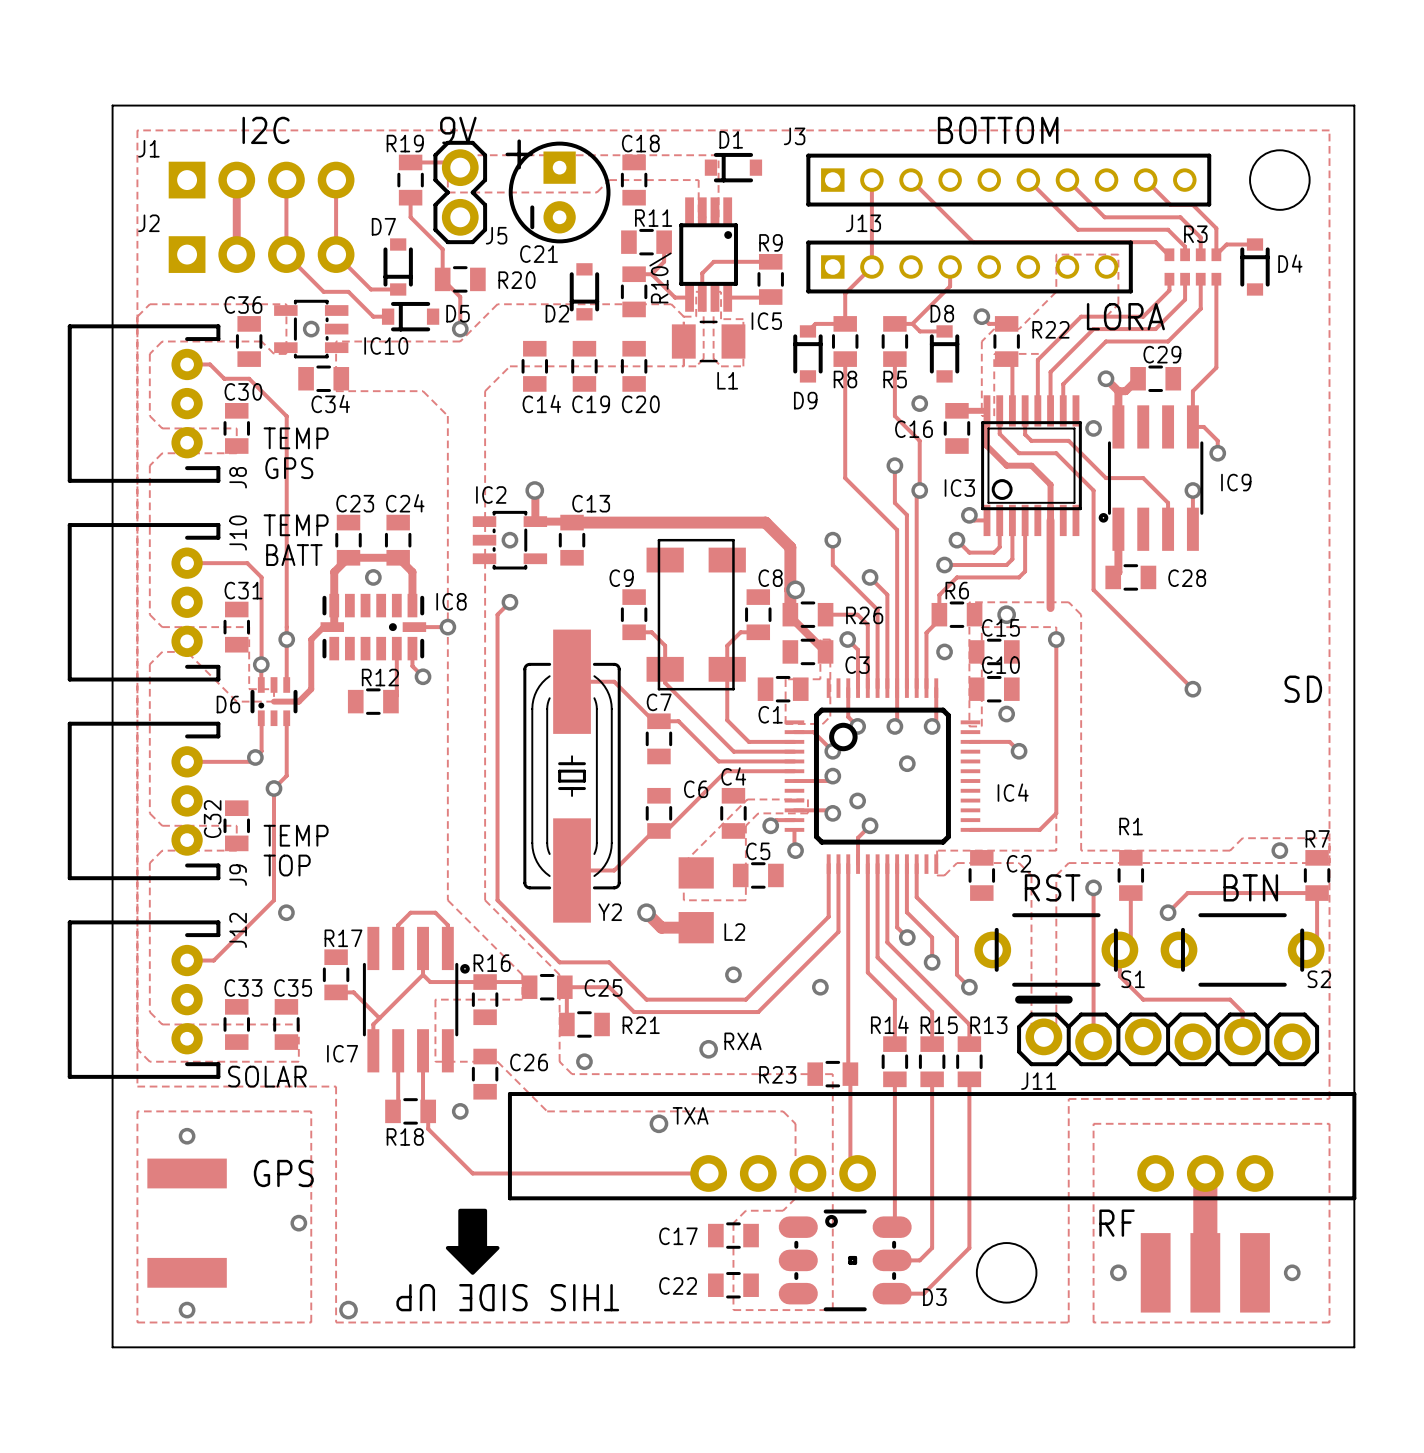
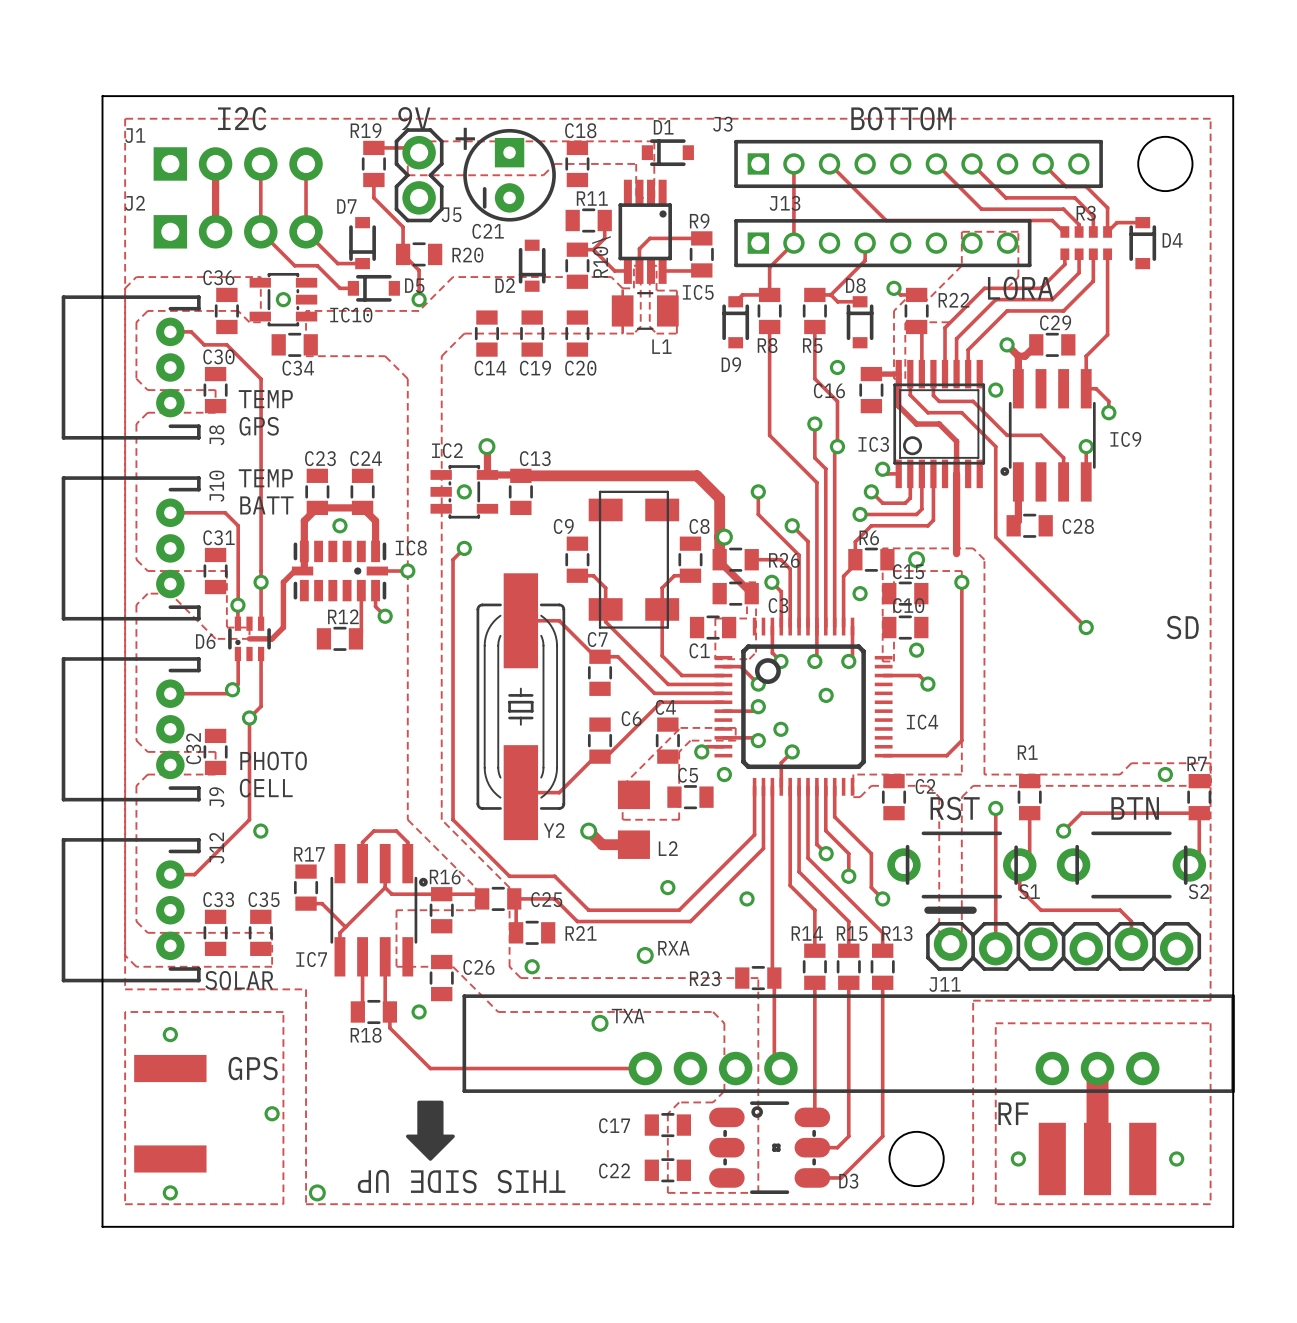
track: (794, 829) (794, 849) -> none
text: TEMP (296, 835) -> PHOTO (273, 760)
text: TOP (287, 865) -> CELL (266, 788)

